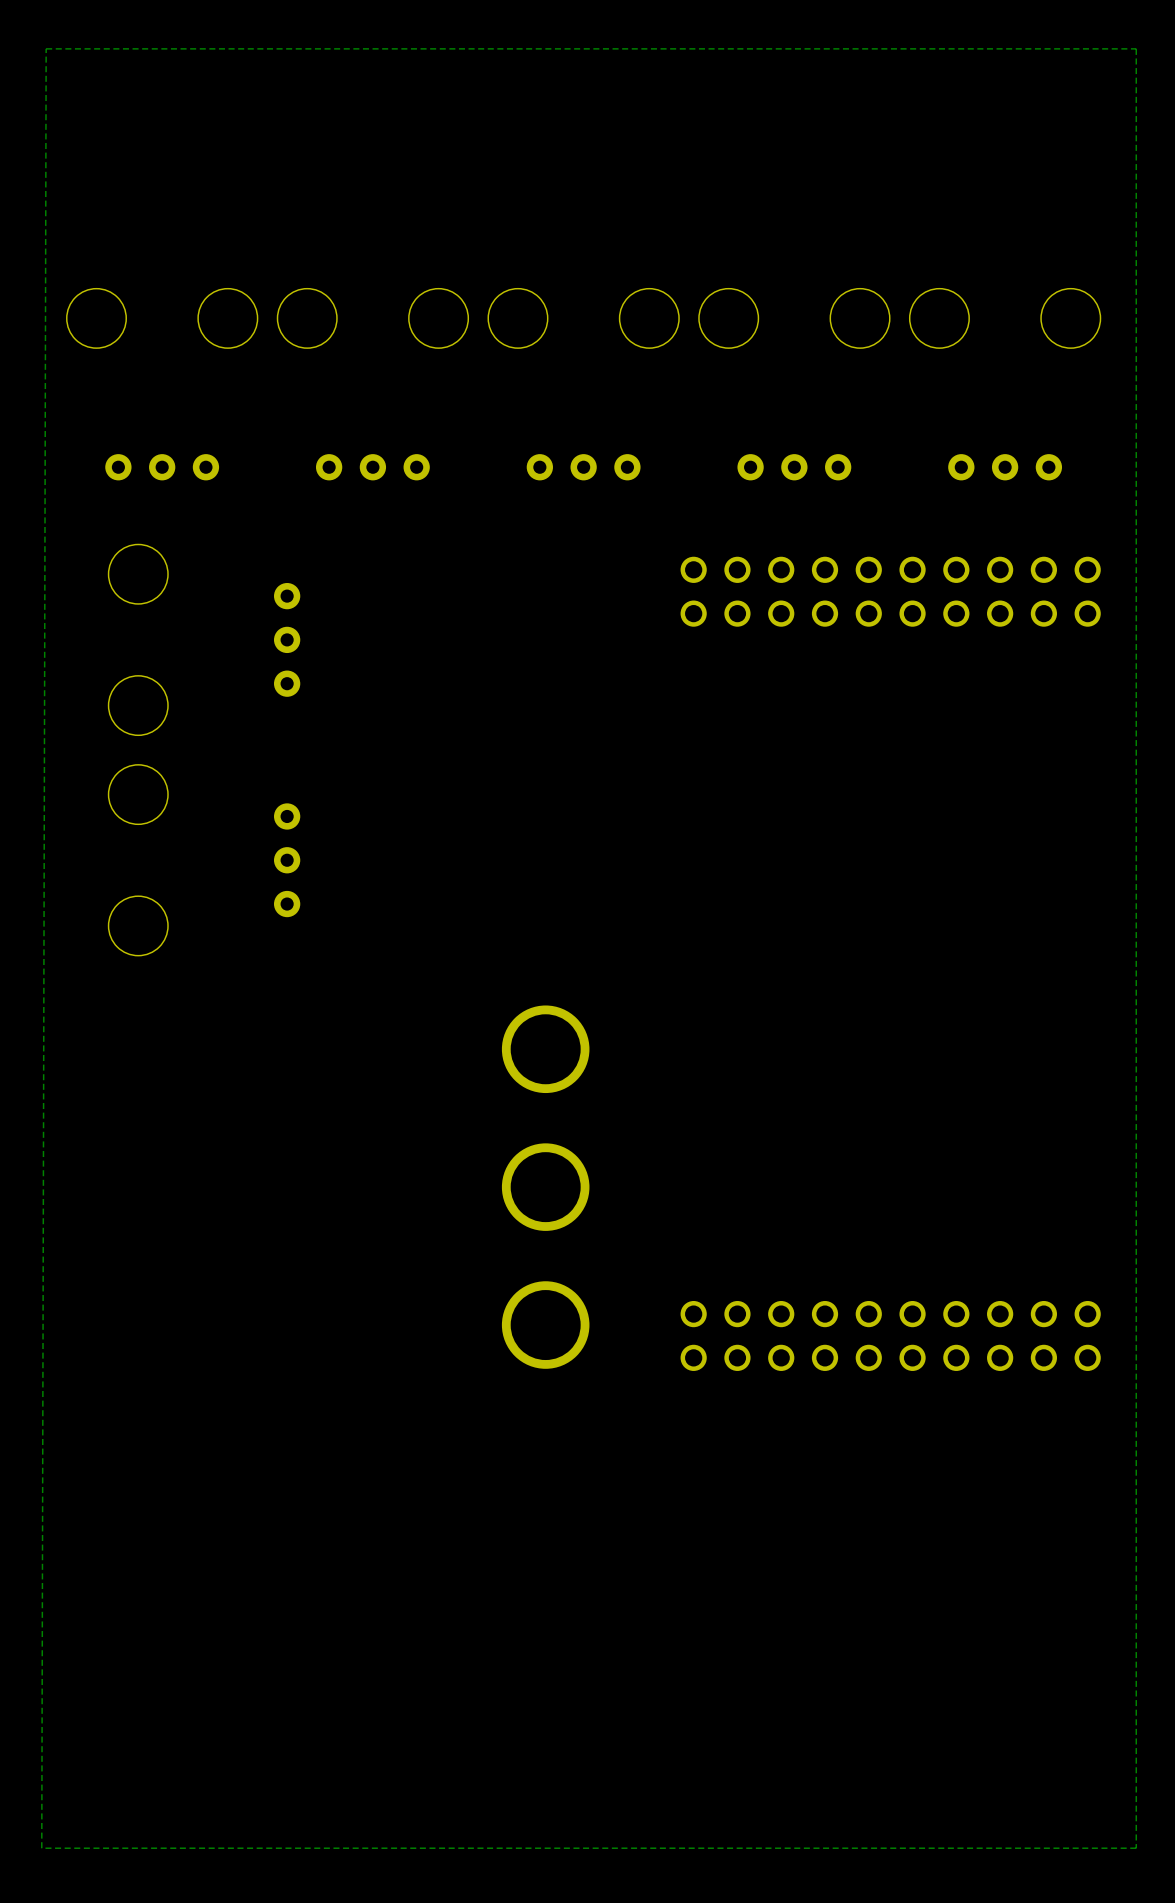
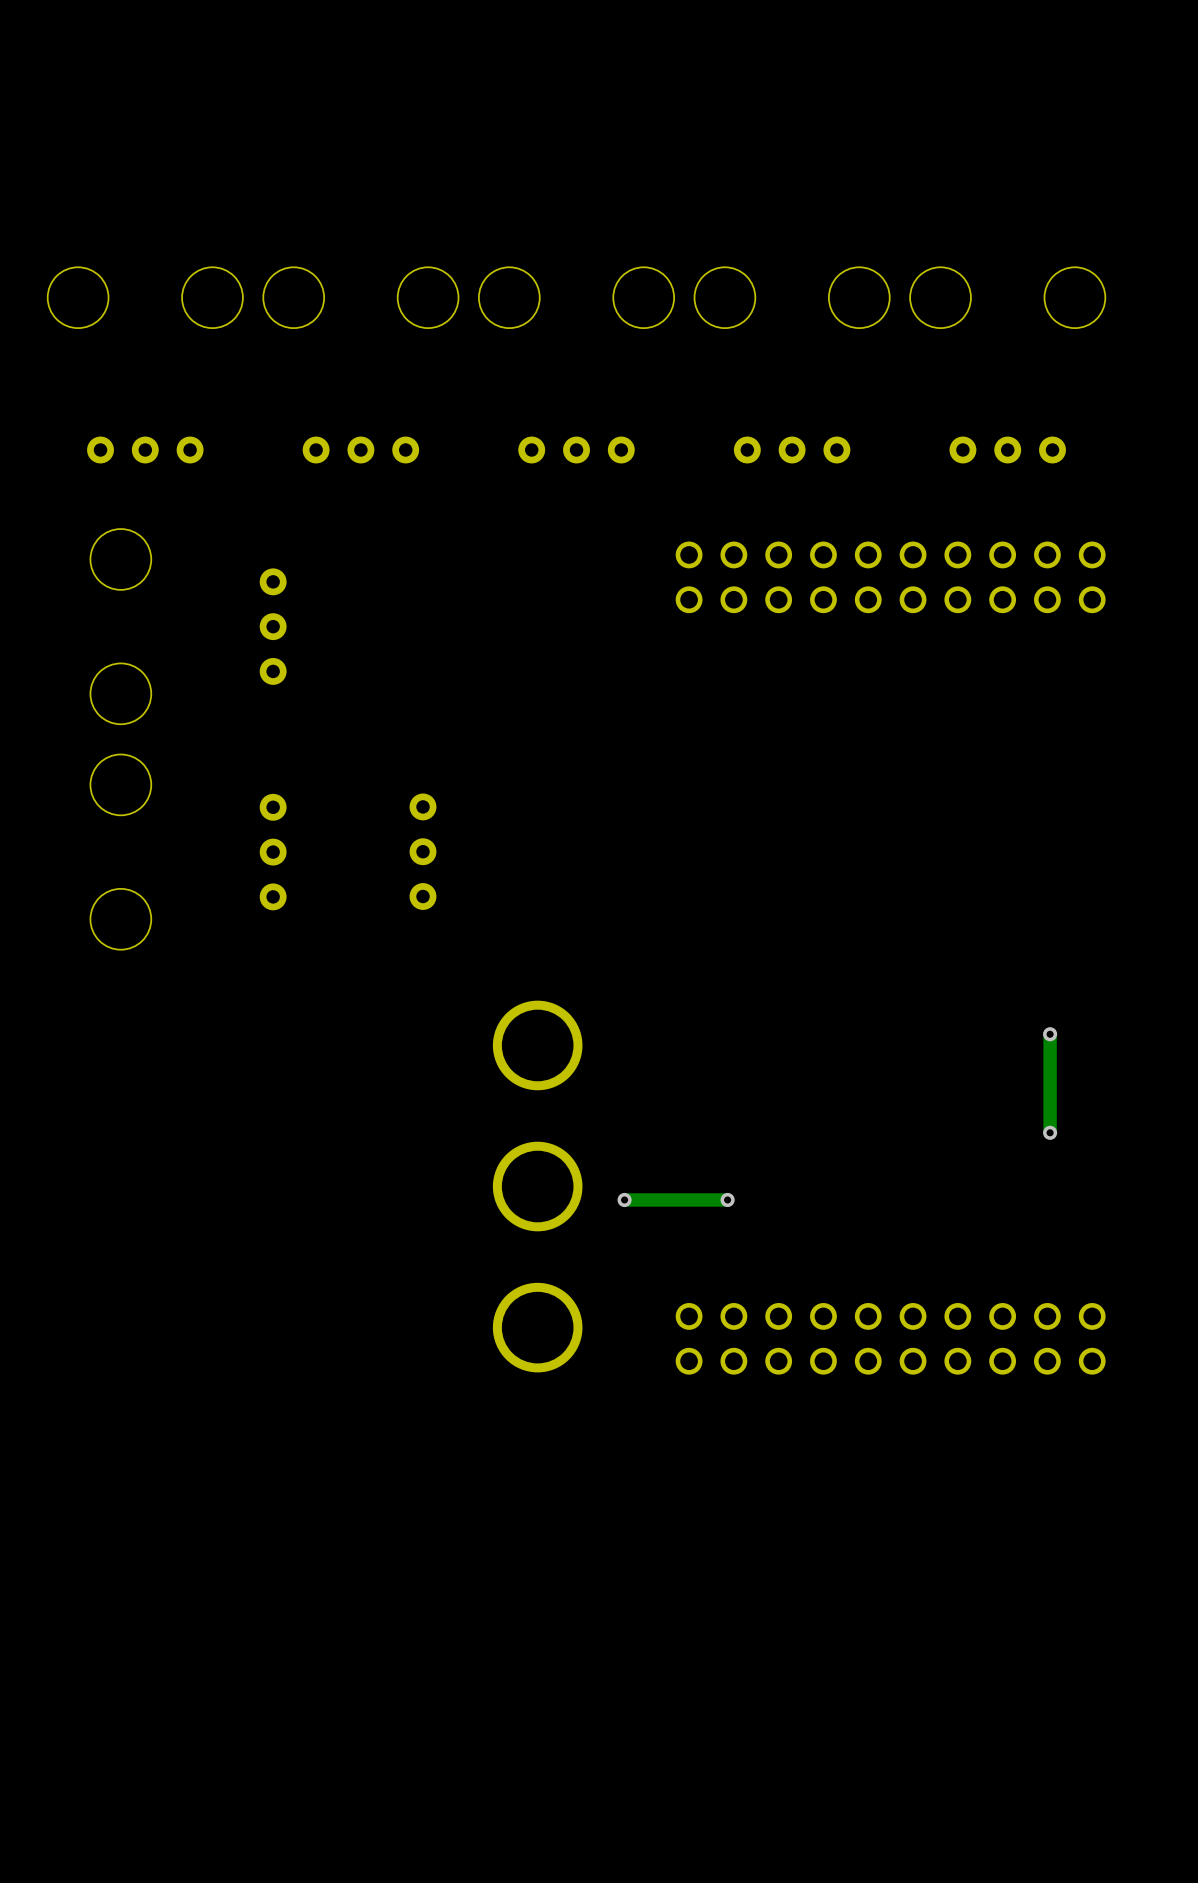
zone outline: (1136, 48) (1136, 1848) (41, 1848) (46, 48) (1136, 48) -> none
part: none -> (423, 851)
track: none -> (1050, 1034) (1050, 1132)
via: none -> (1050, 1034)
via: none -> (1050, 1132)
via: none -> (624, 1199)
track: none -> (727, 1199) (624, 1199)
via: none -> (727, 1199)

